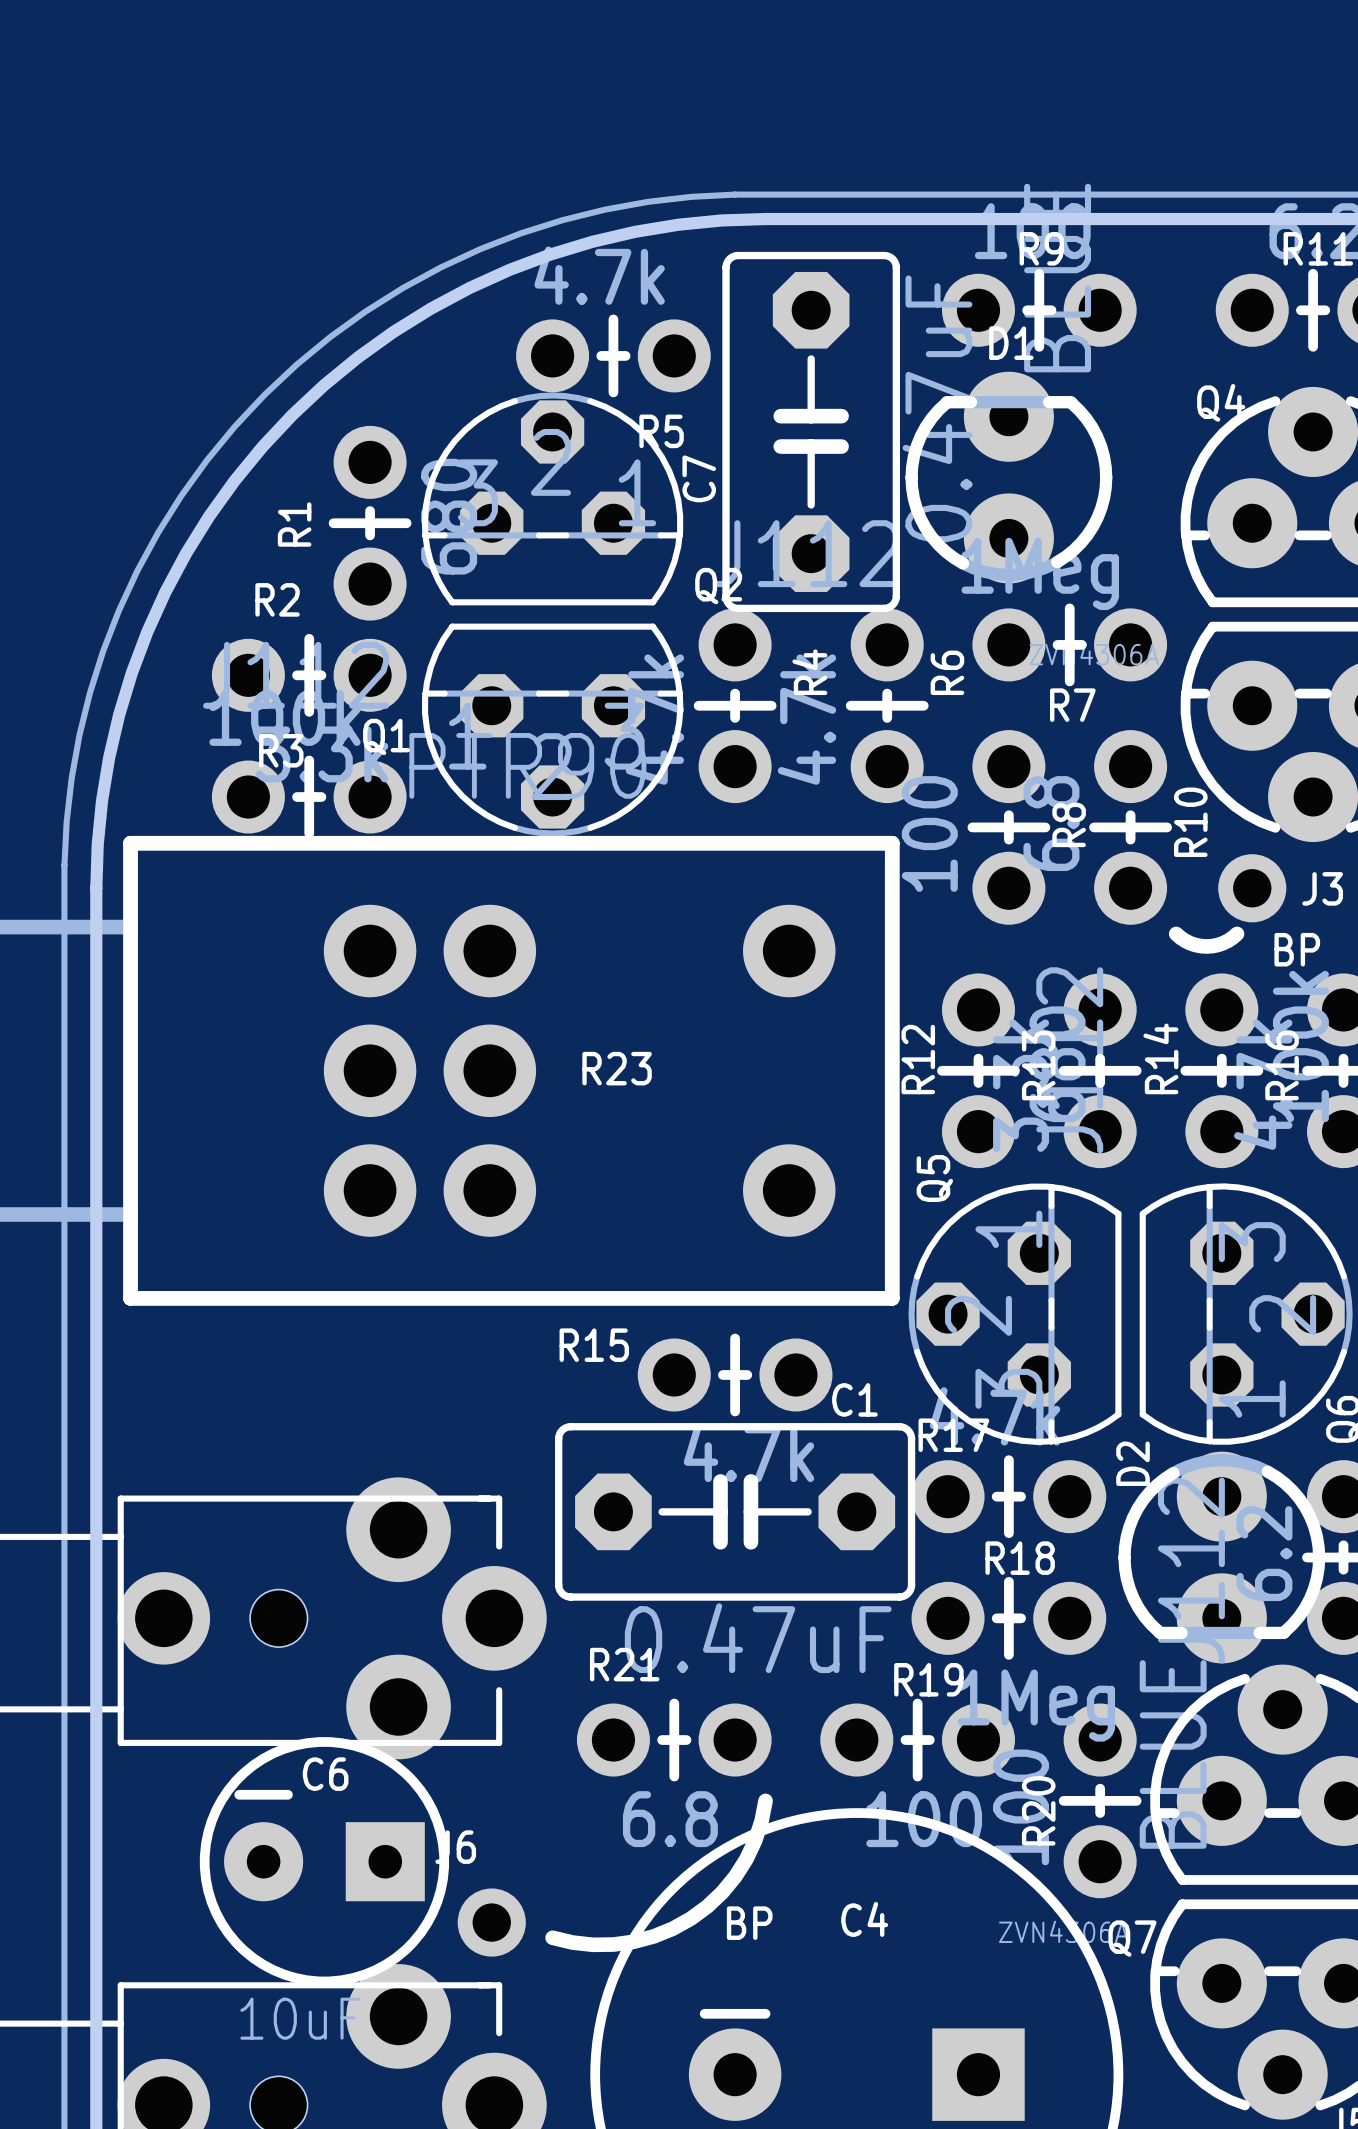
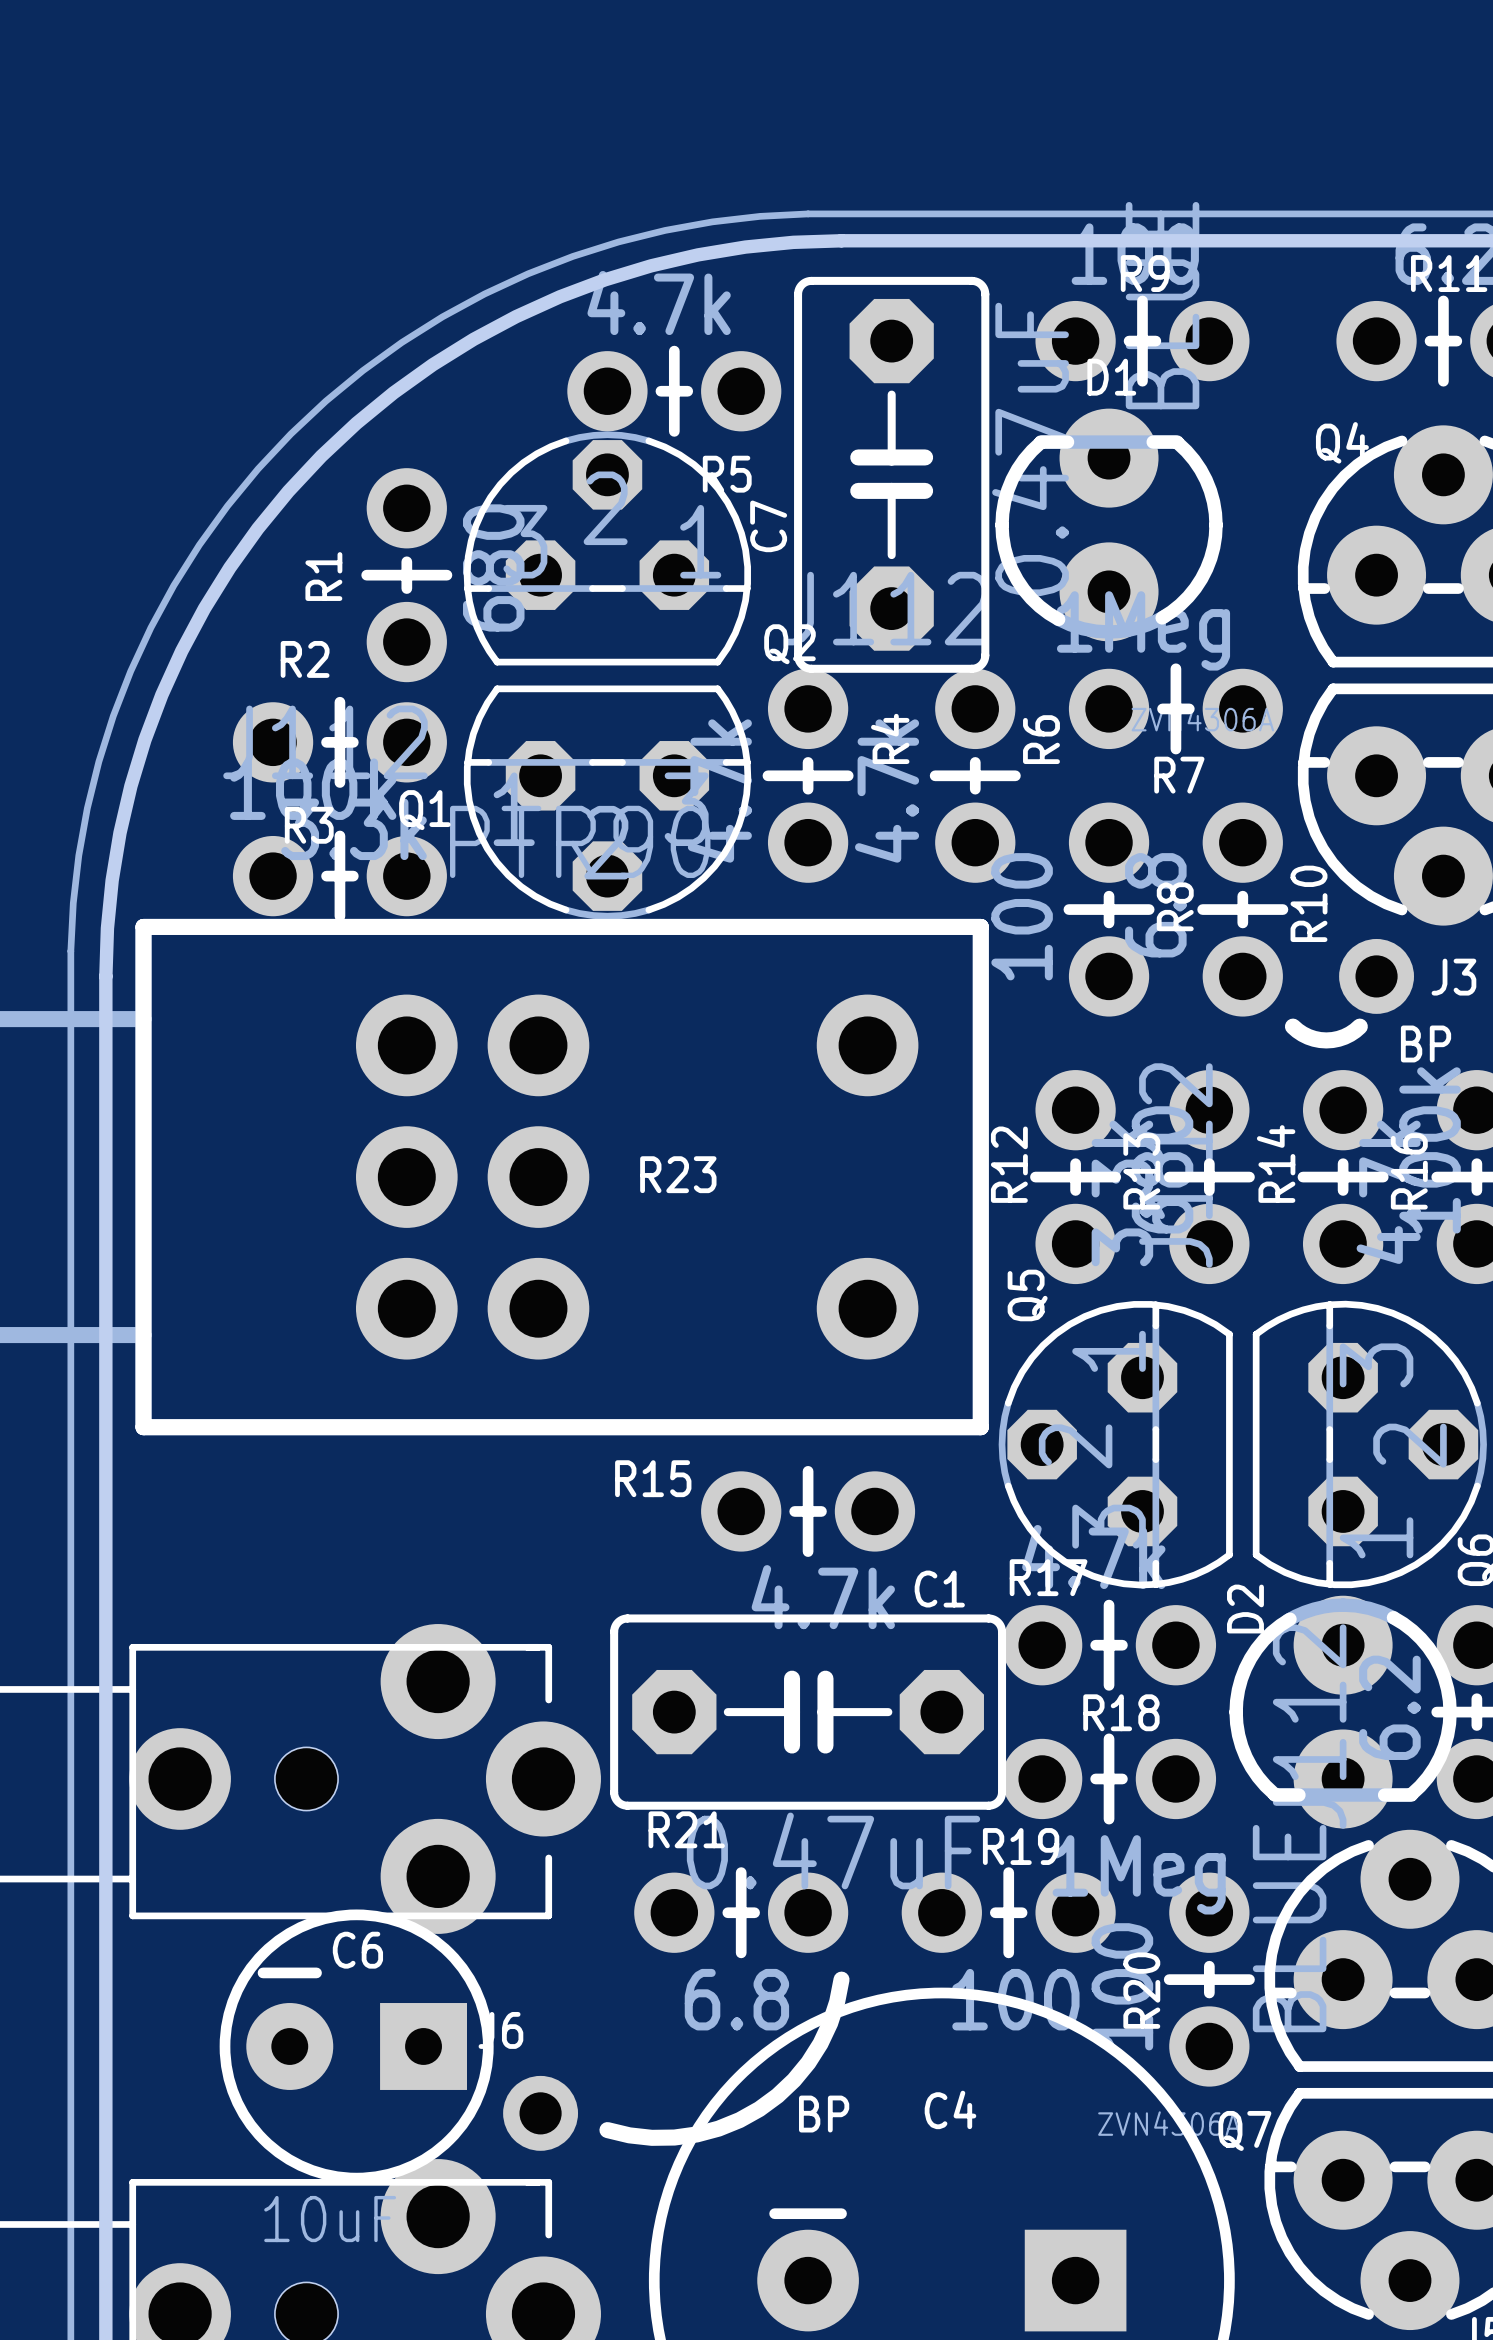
C1 position: (735, 1511) -> (808, 1712)

